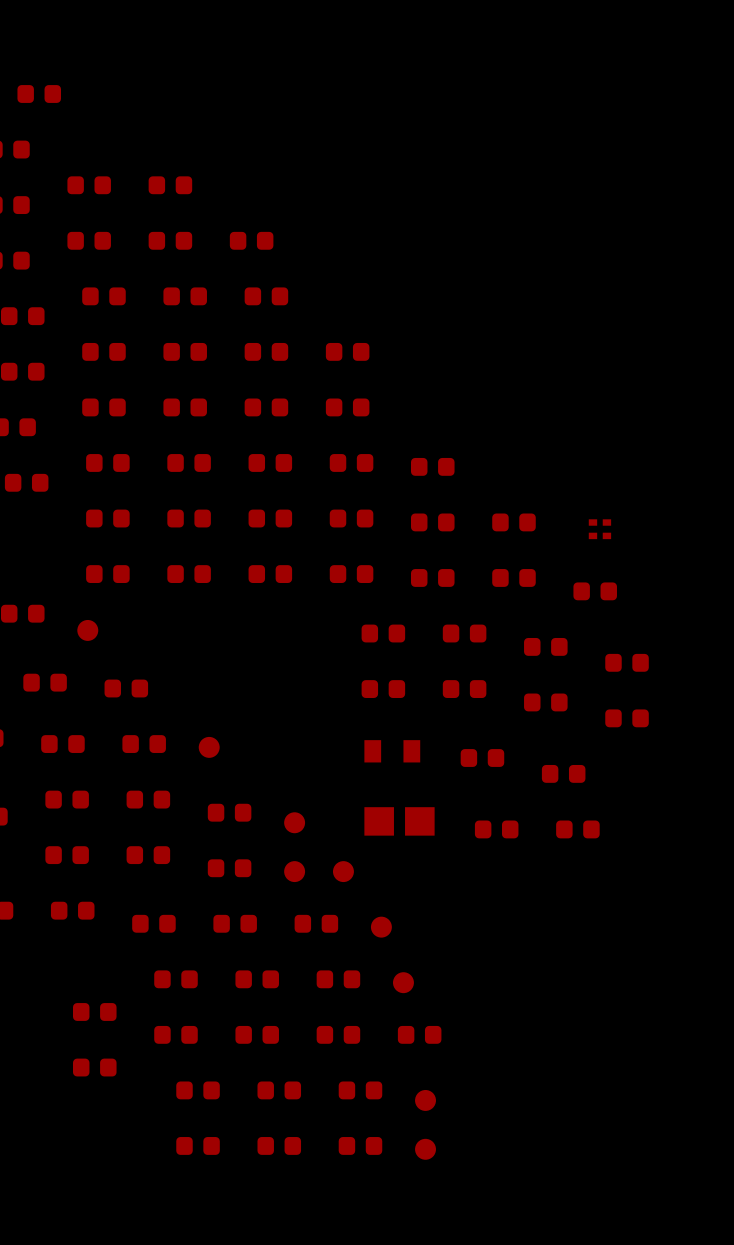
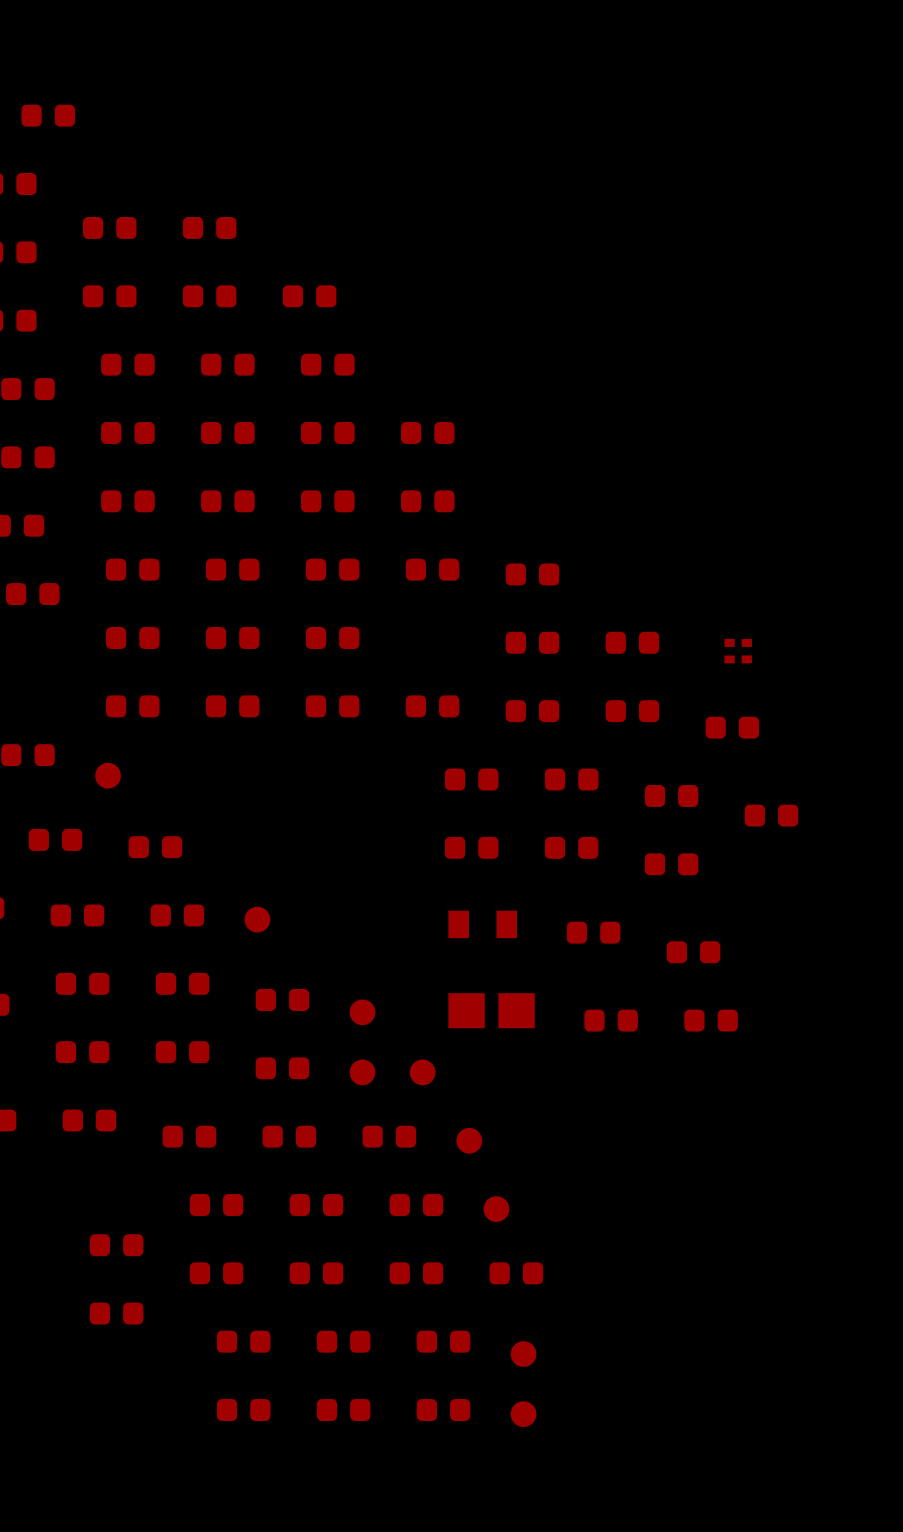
part: (351, 518) -> none
part: (627, 718) -> none

